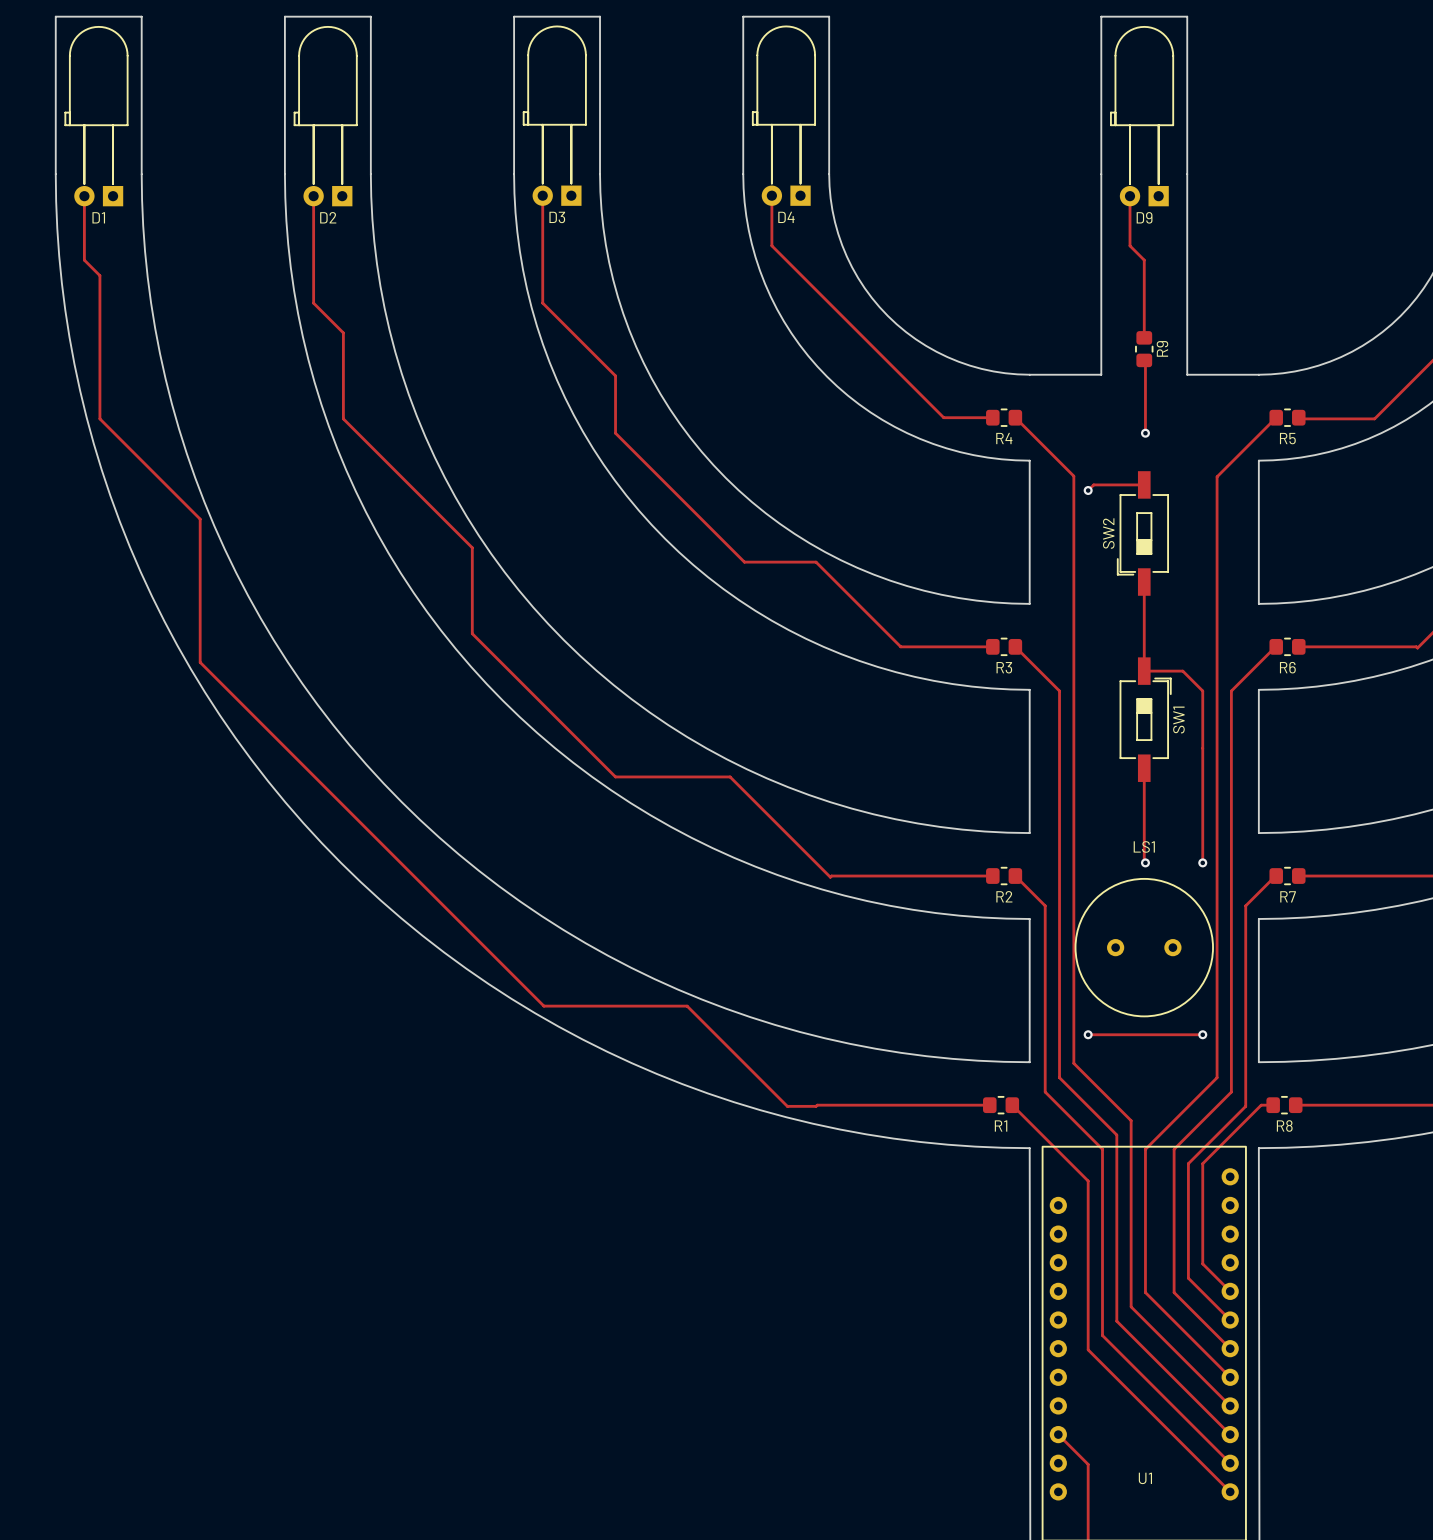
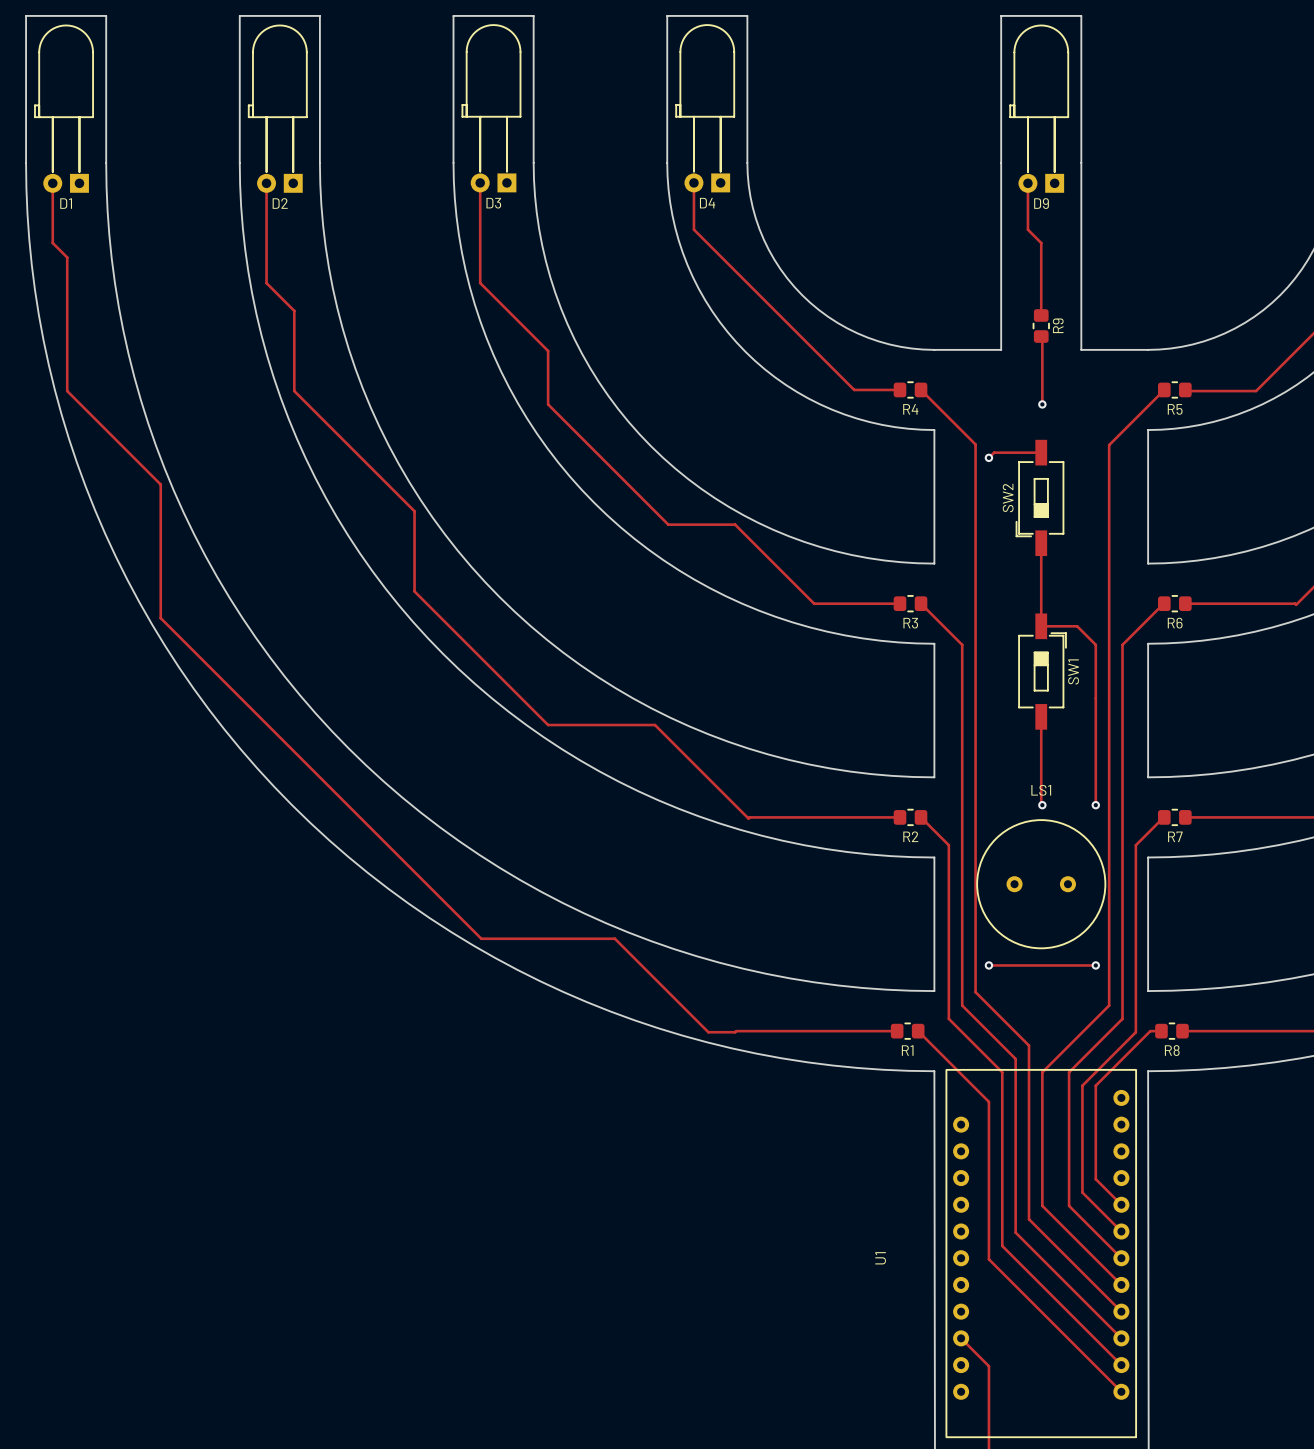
U1 name rotation: 0° (1145, 1478) -> 90° counterclockwise (880, 1258)
U1 name position: U1 (1145, 1478) -> U1 (880, 1258)

